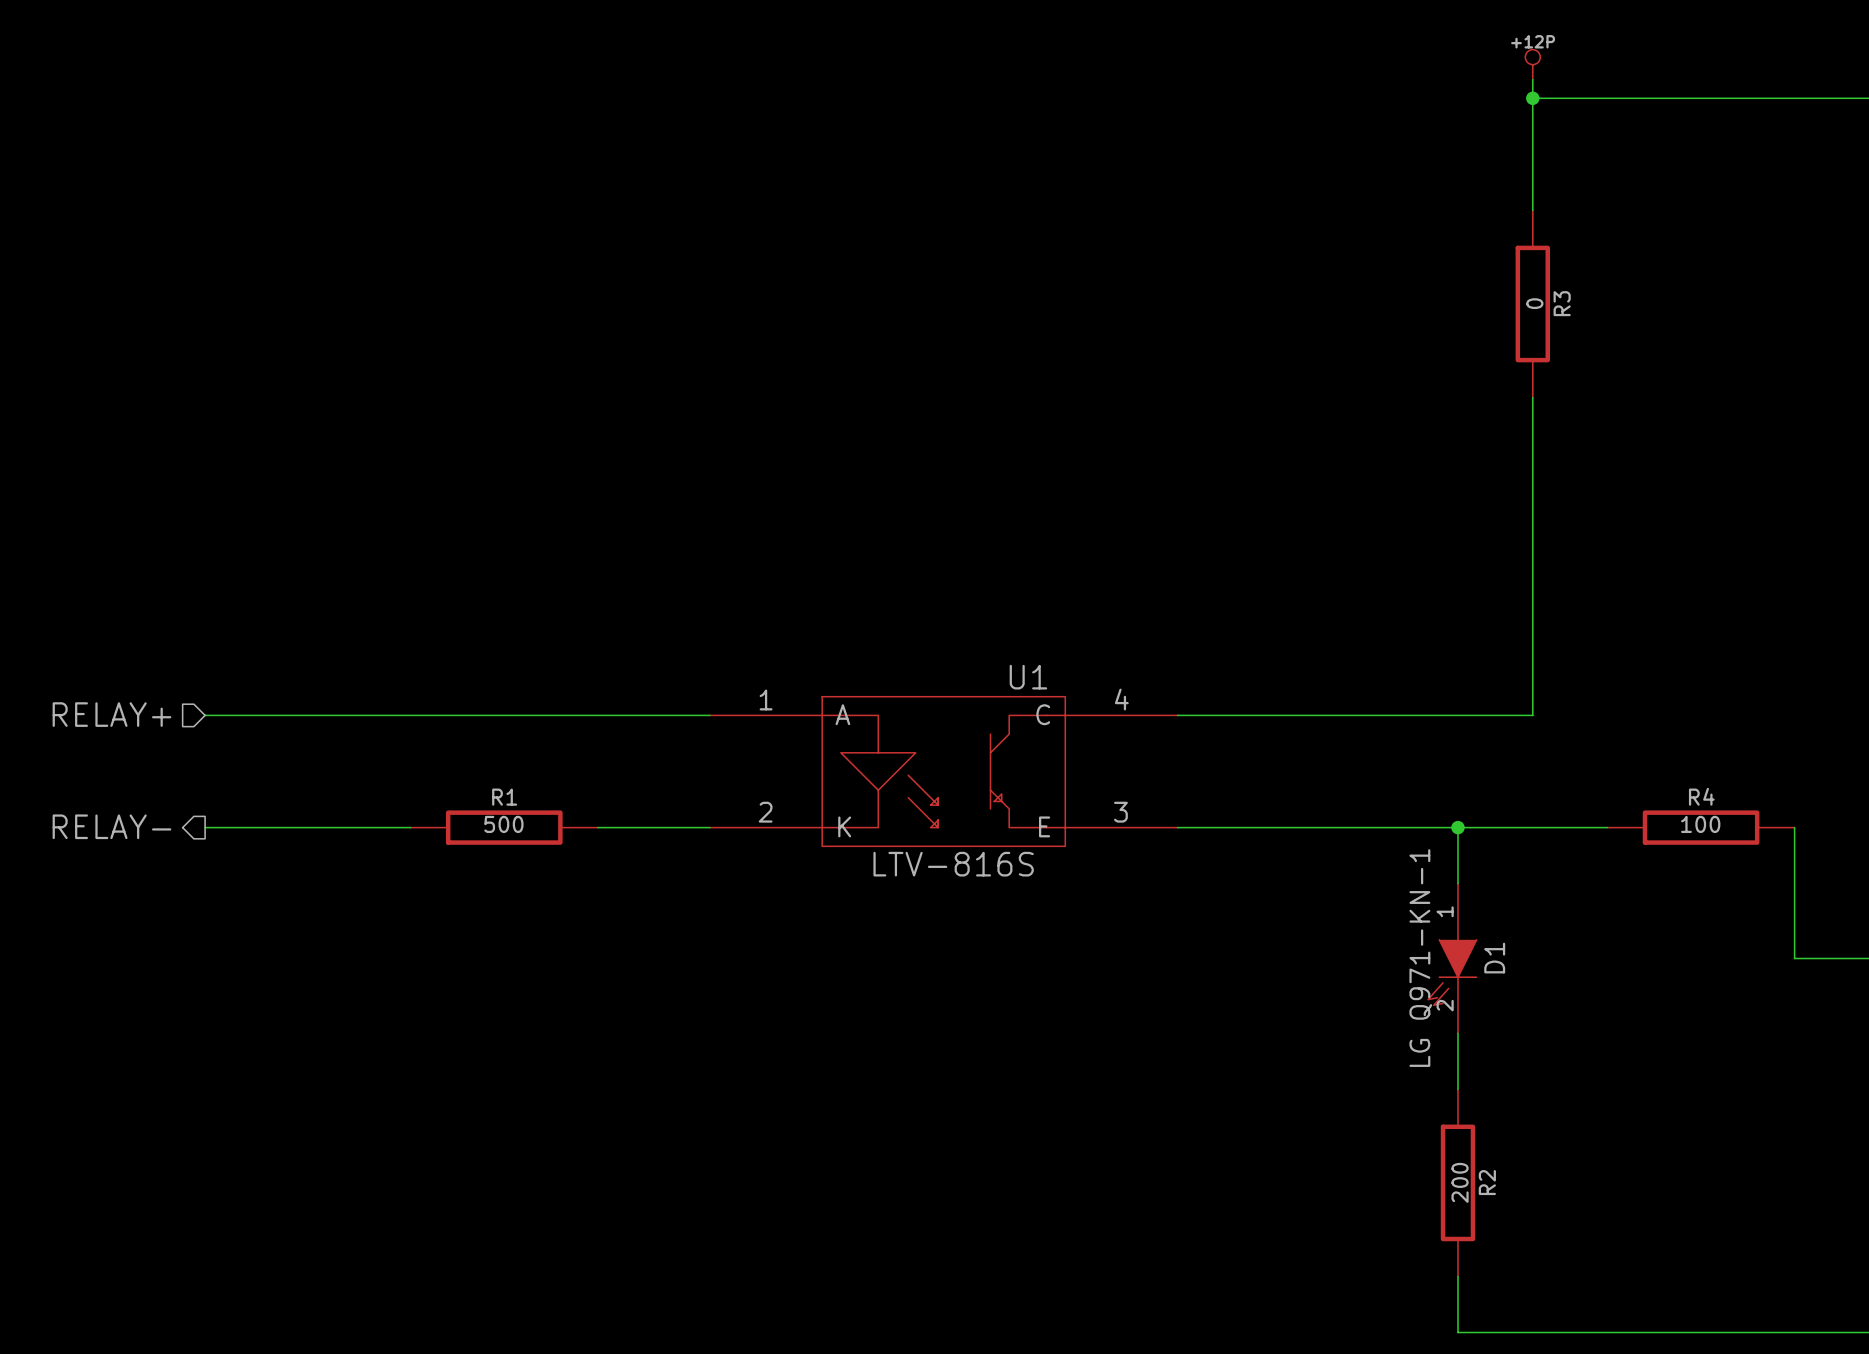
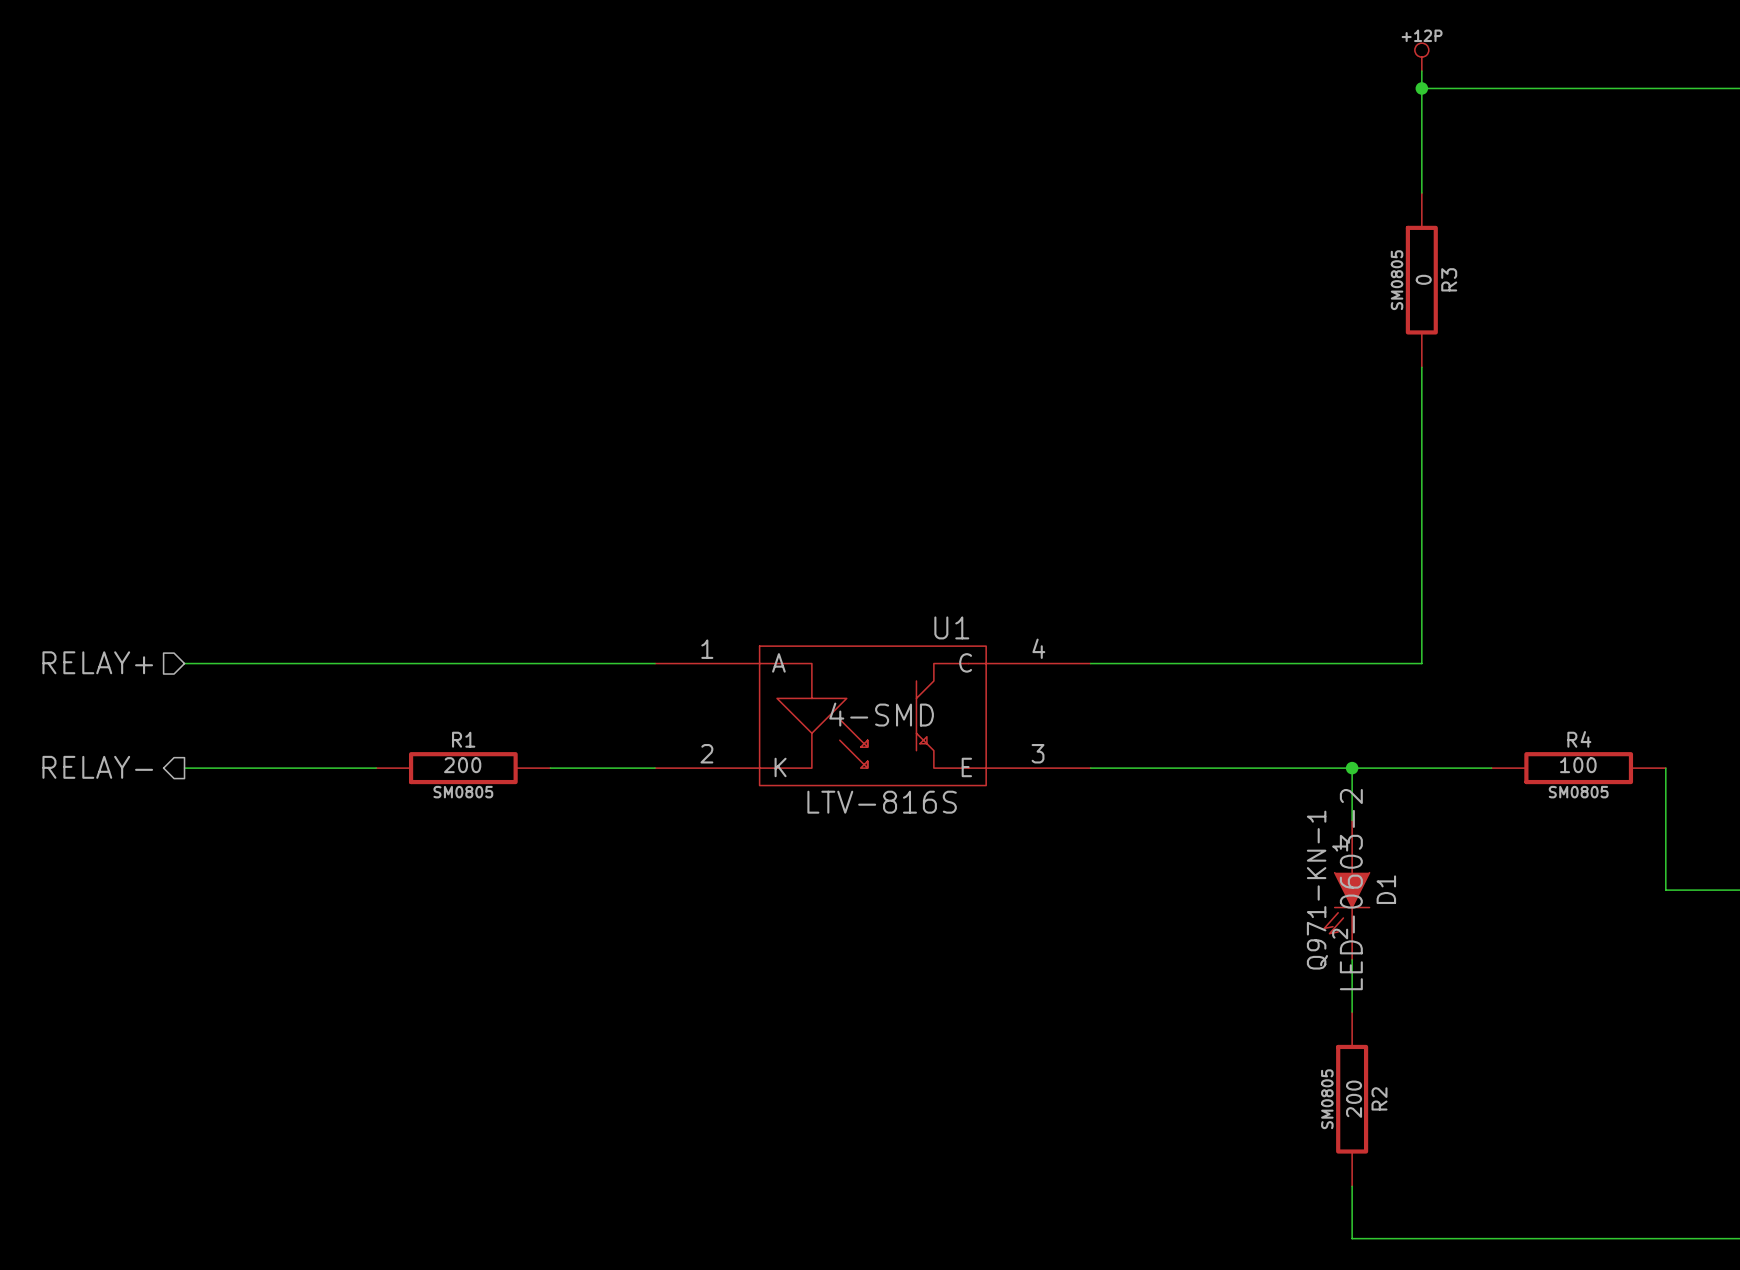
R3 text: none -> SM0805 (1397, 280)
U1 text: none -> 4-SMD (881, 714)
R1 value: 500 (503, 824) -> 200 (462, 765)
R1 text: none -> SM0805 (463, 792)
R4 text: none -> SM0805 (1578, 792)
D1 text: none -> LED-0603-2 (1351, 889)
D1 value: LG Q971-KN-1 (1420, 958) -> Q971-KN-1 (1317, 890)
R2 text: none -> SM0805 (1327, 1099)

